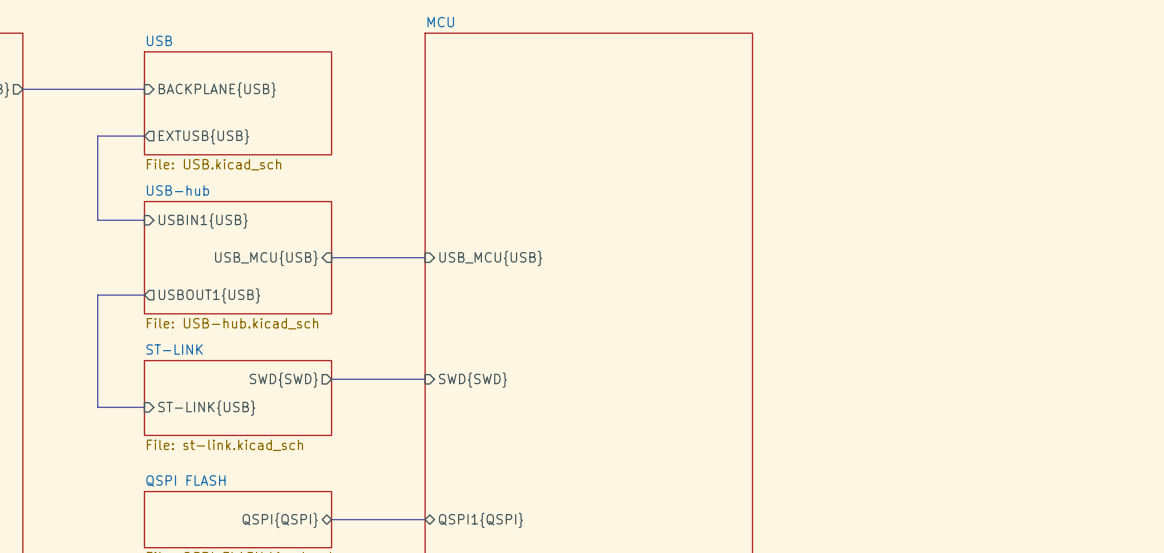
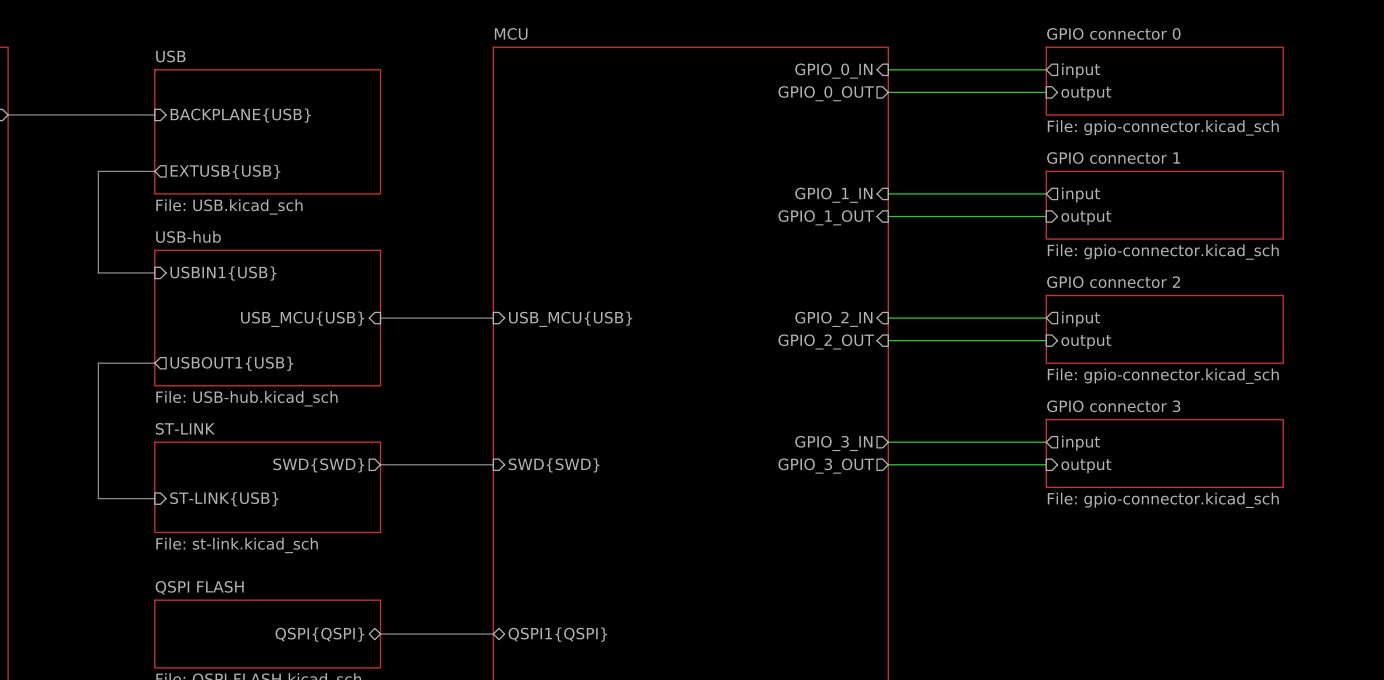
sheet pin: none -> GPIO_0_IN (833, 71)
wire: none -> (888, 69) (1046, 69)
sheet pin: none -> input (1081, 70)
sheet GPIO connector 0: none -> File: gpio-connector.kicad_sch (1164, 81)
sheet pin: none -> GPIO_0_OUT (826, 93)
wire: none -> (888, 92) (1046, 92)
sheet pin: none -> output (1086, 93)
sheet pin: none -> GPIO_1_IN (833, 195)
wire: none -> (888, 193) (1046, 193)
sheet pin: none -> input (1081, 194)
sheet GPIO connector 1: none -> File: gpio-connector.kicad_sch (1164, 205)
sheet pin: none -> GPIO_1_OUT (826, 217)
wire: none -> (888, 216) (1046, 216)
sheet pin: none -> output (1086, 217)
sheet pin: none -> GPIO_2_IN (833, 319)
wire: none -> (888, 318) (1046, 318)
sheet pin: none -> input (1081, 319)
sheet GPIO connector 2: none -> File: gpio-connector.kicad_sch (1164, 329)
sheet pin: none -> GPIO_2_OUT (826, 341)
wire: none -> (888, 340) (1046, 340)
sheet pin: none -> output (1086, 342)
sheet pin: none -> GPIO_3_IN (833, 443)
wire: none -> (888, 442) (1046, 442)
sheet pin: none -> input (1081, 443)
sheet GPIO connector 3: none -> File: gpio-connector.kicad_sch (1164, 453)
sheet pin: none -> GPIO_3_OUT (826, 466)
wire: none -> (888, 464) (1046, 464)
sheet pin: none -> output (1086, 466)

